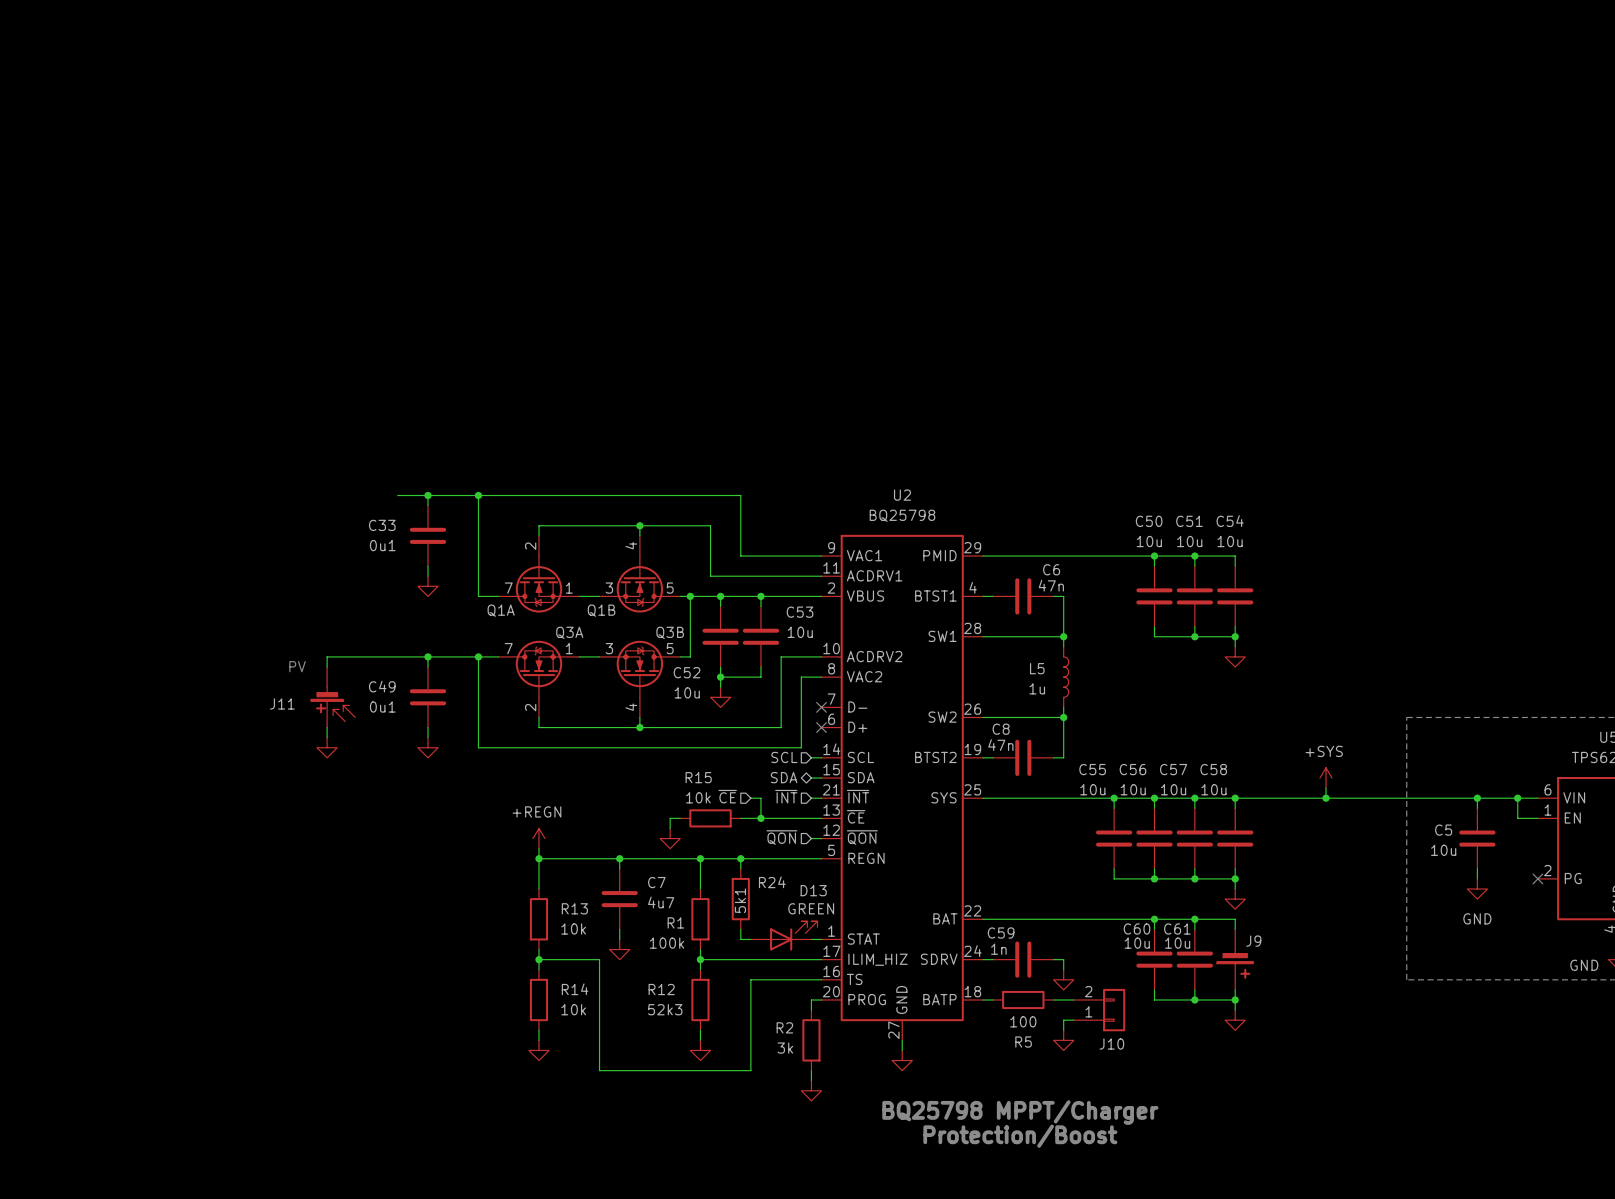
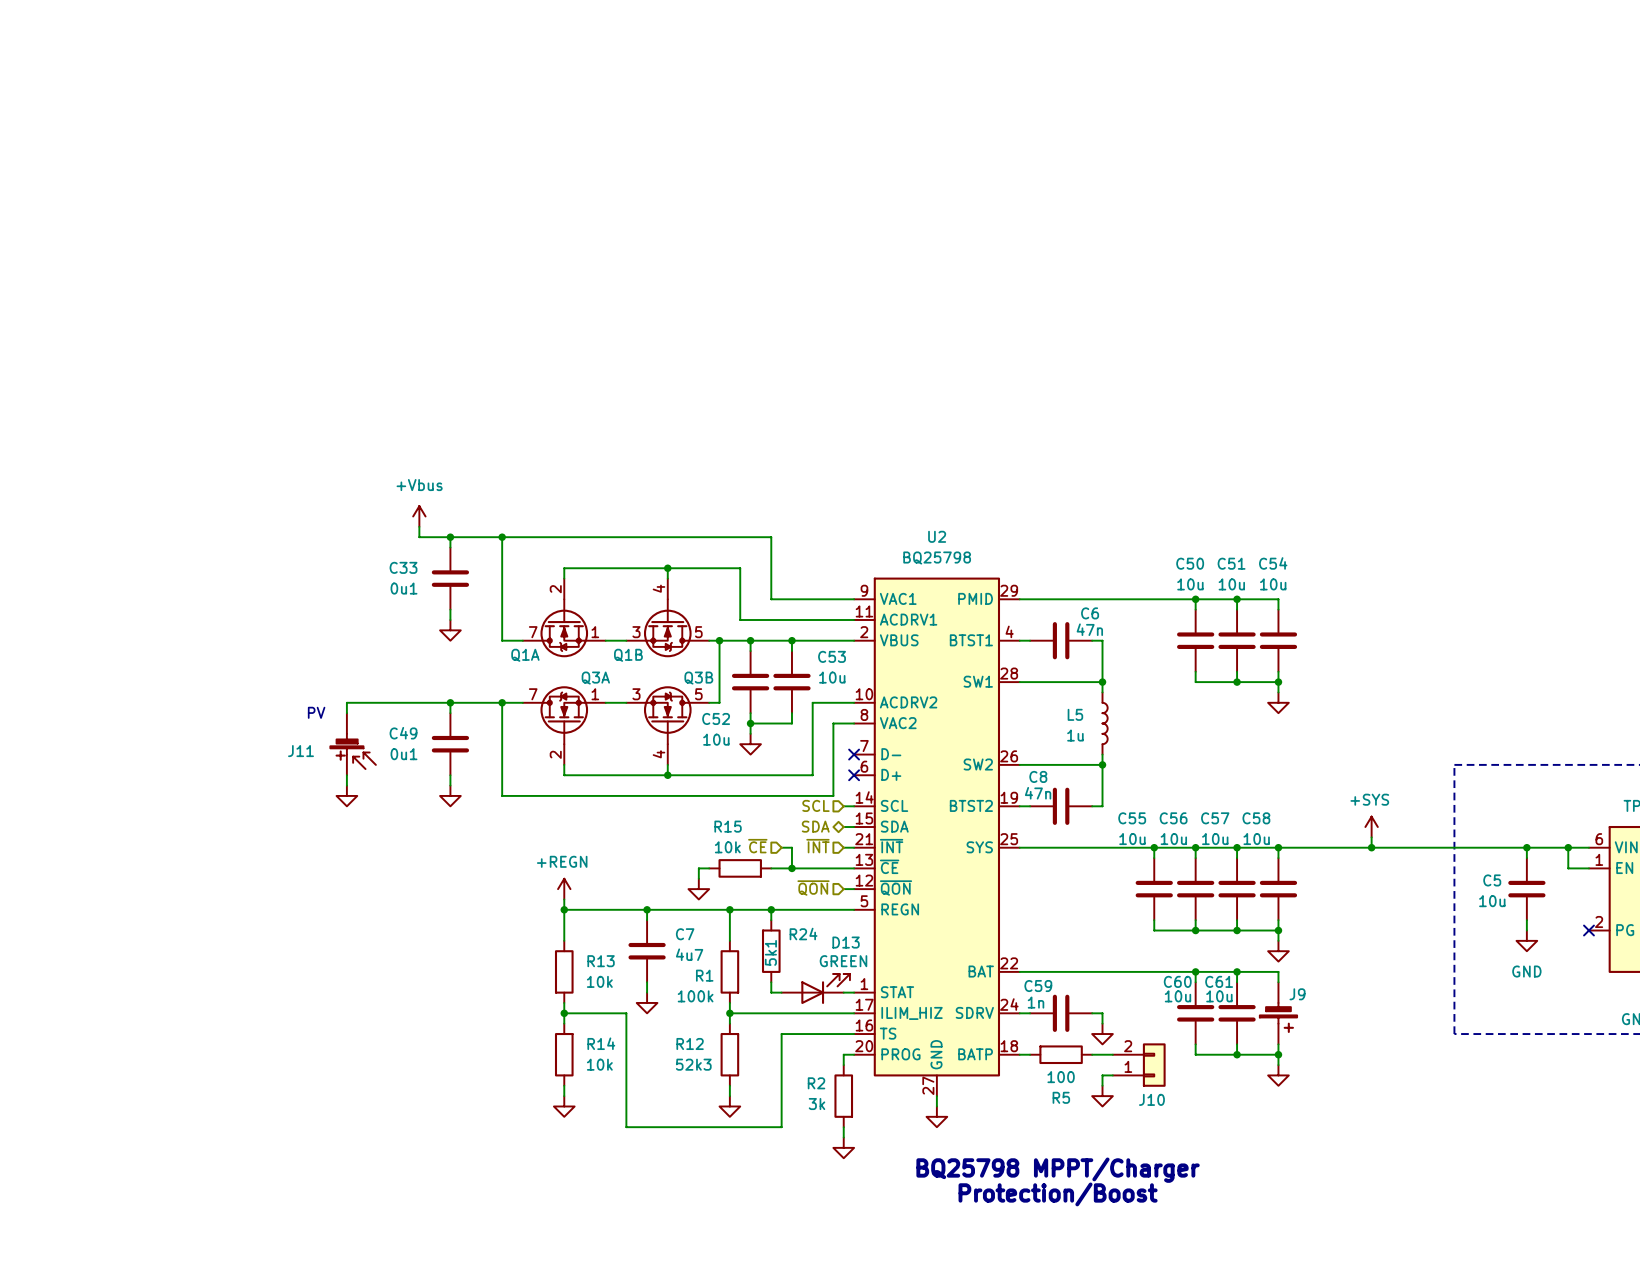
power symbol: none -> +Vbus (419, 516)
wire: none -> (419, 526) (419, 537)

